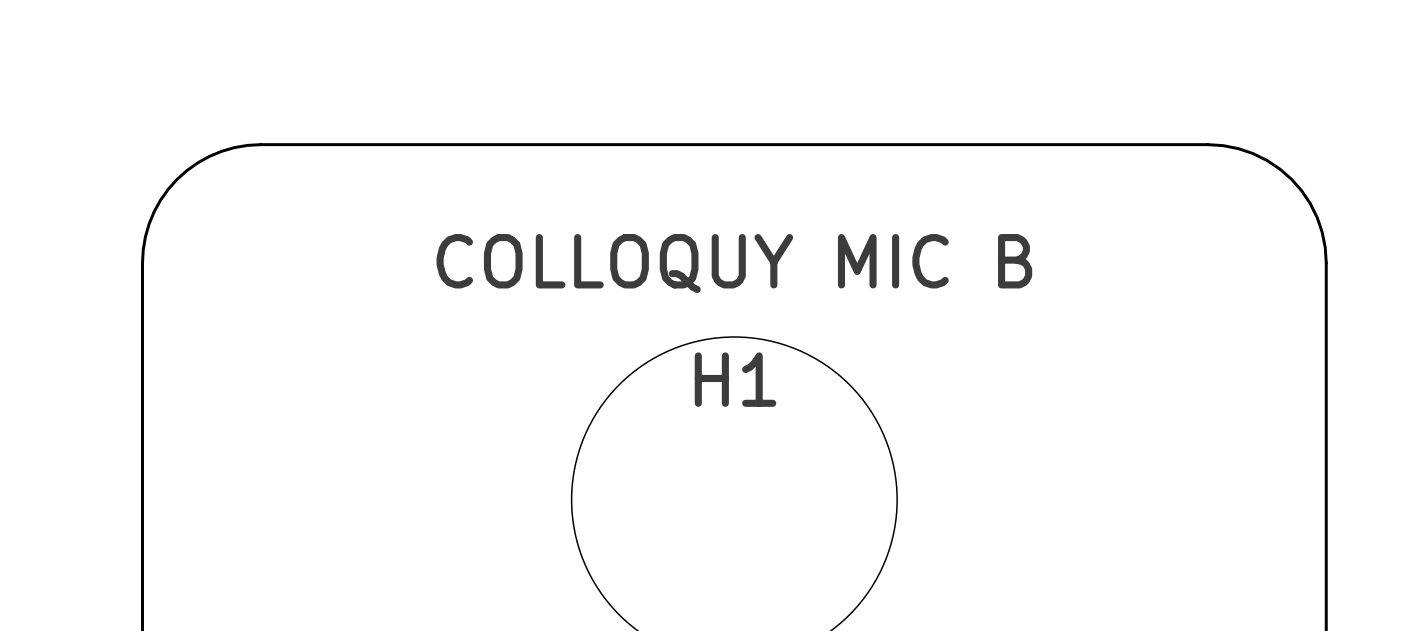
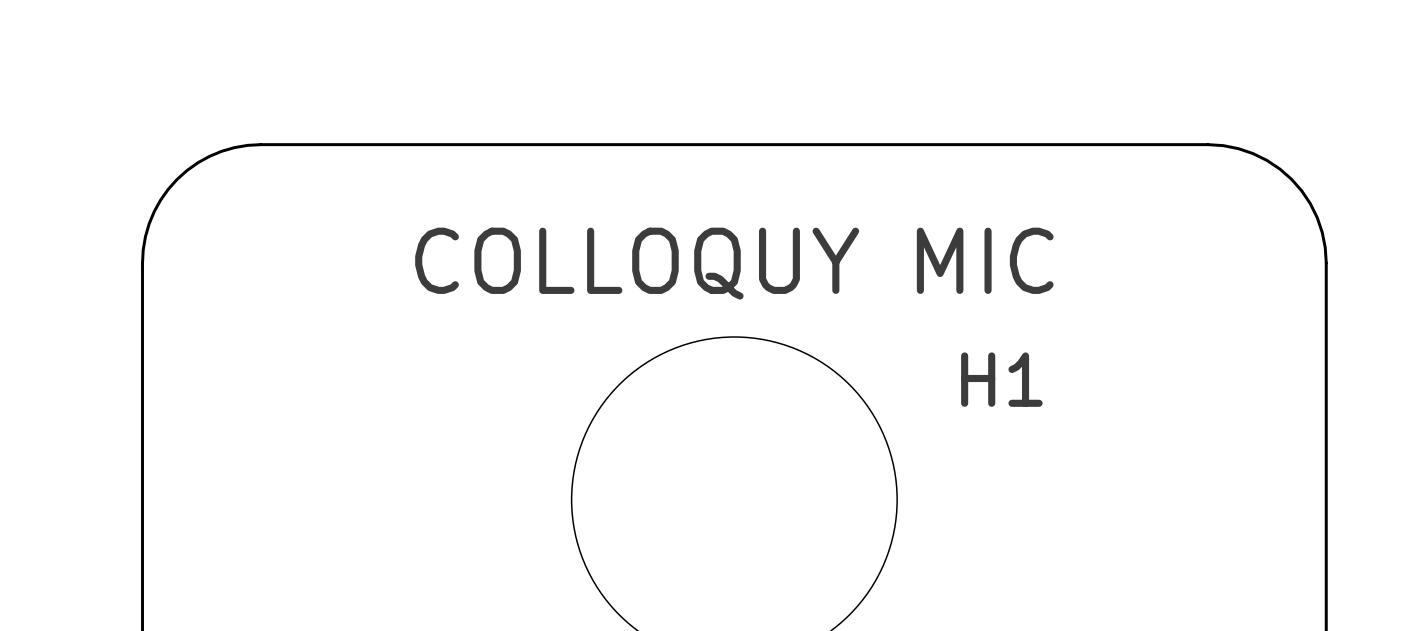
text: COLLOQUY MIC B (734, 263) -> COLLOQUY MIC (734, 263)
H1 name position: H1 (735, 379) -> H1 (1001, 379)

